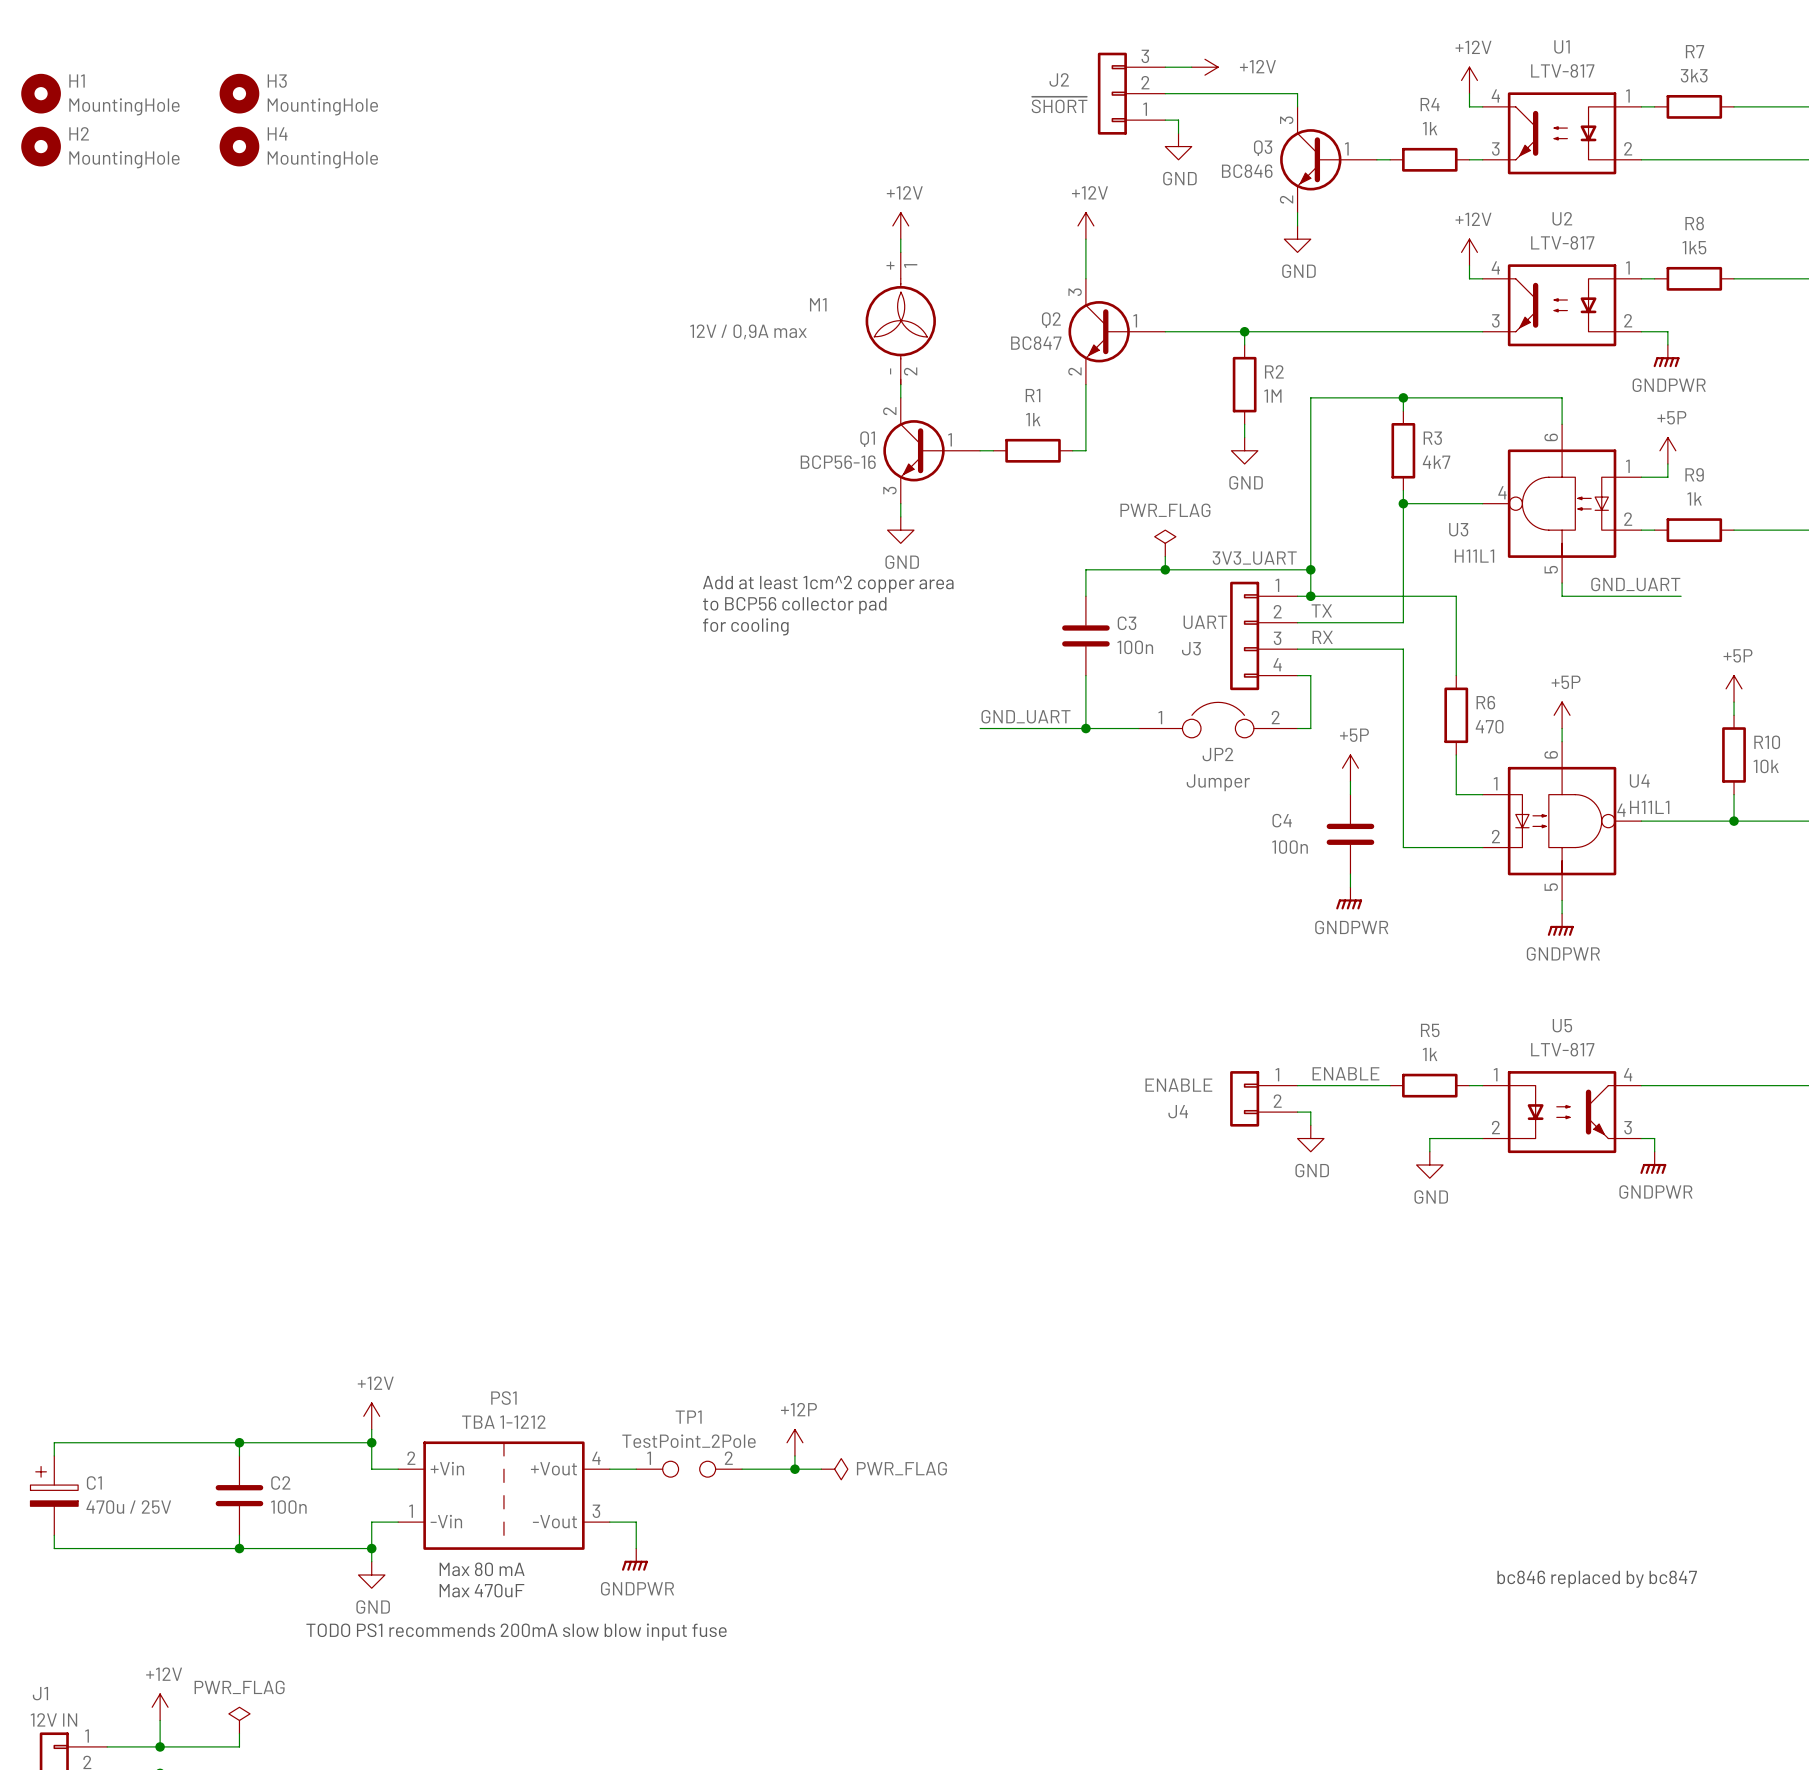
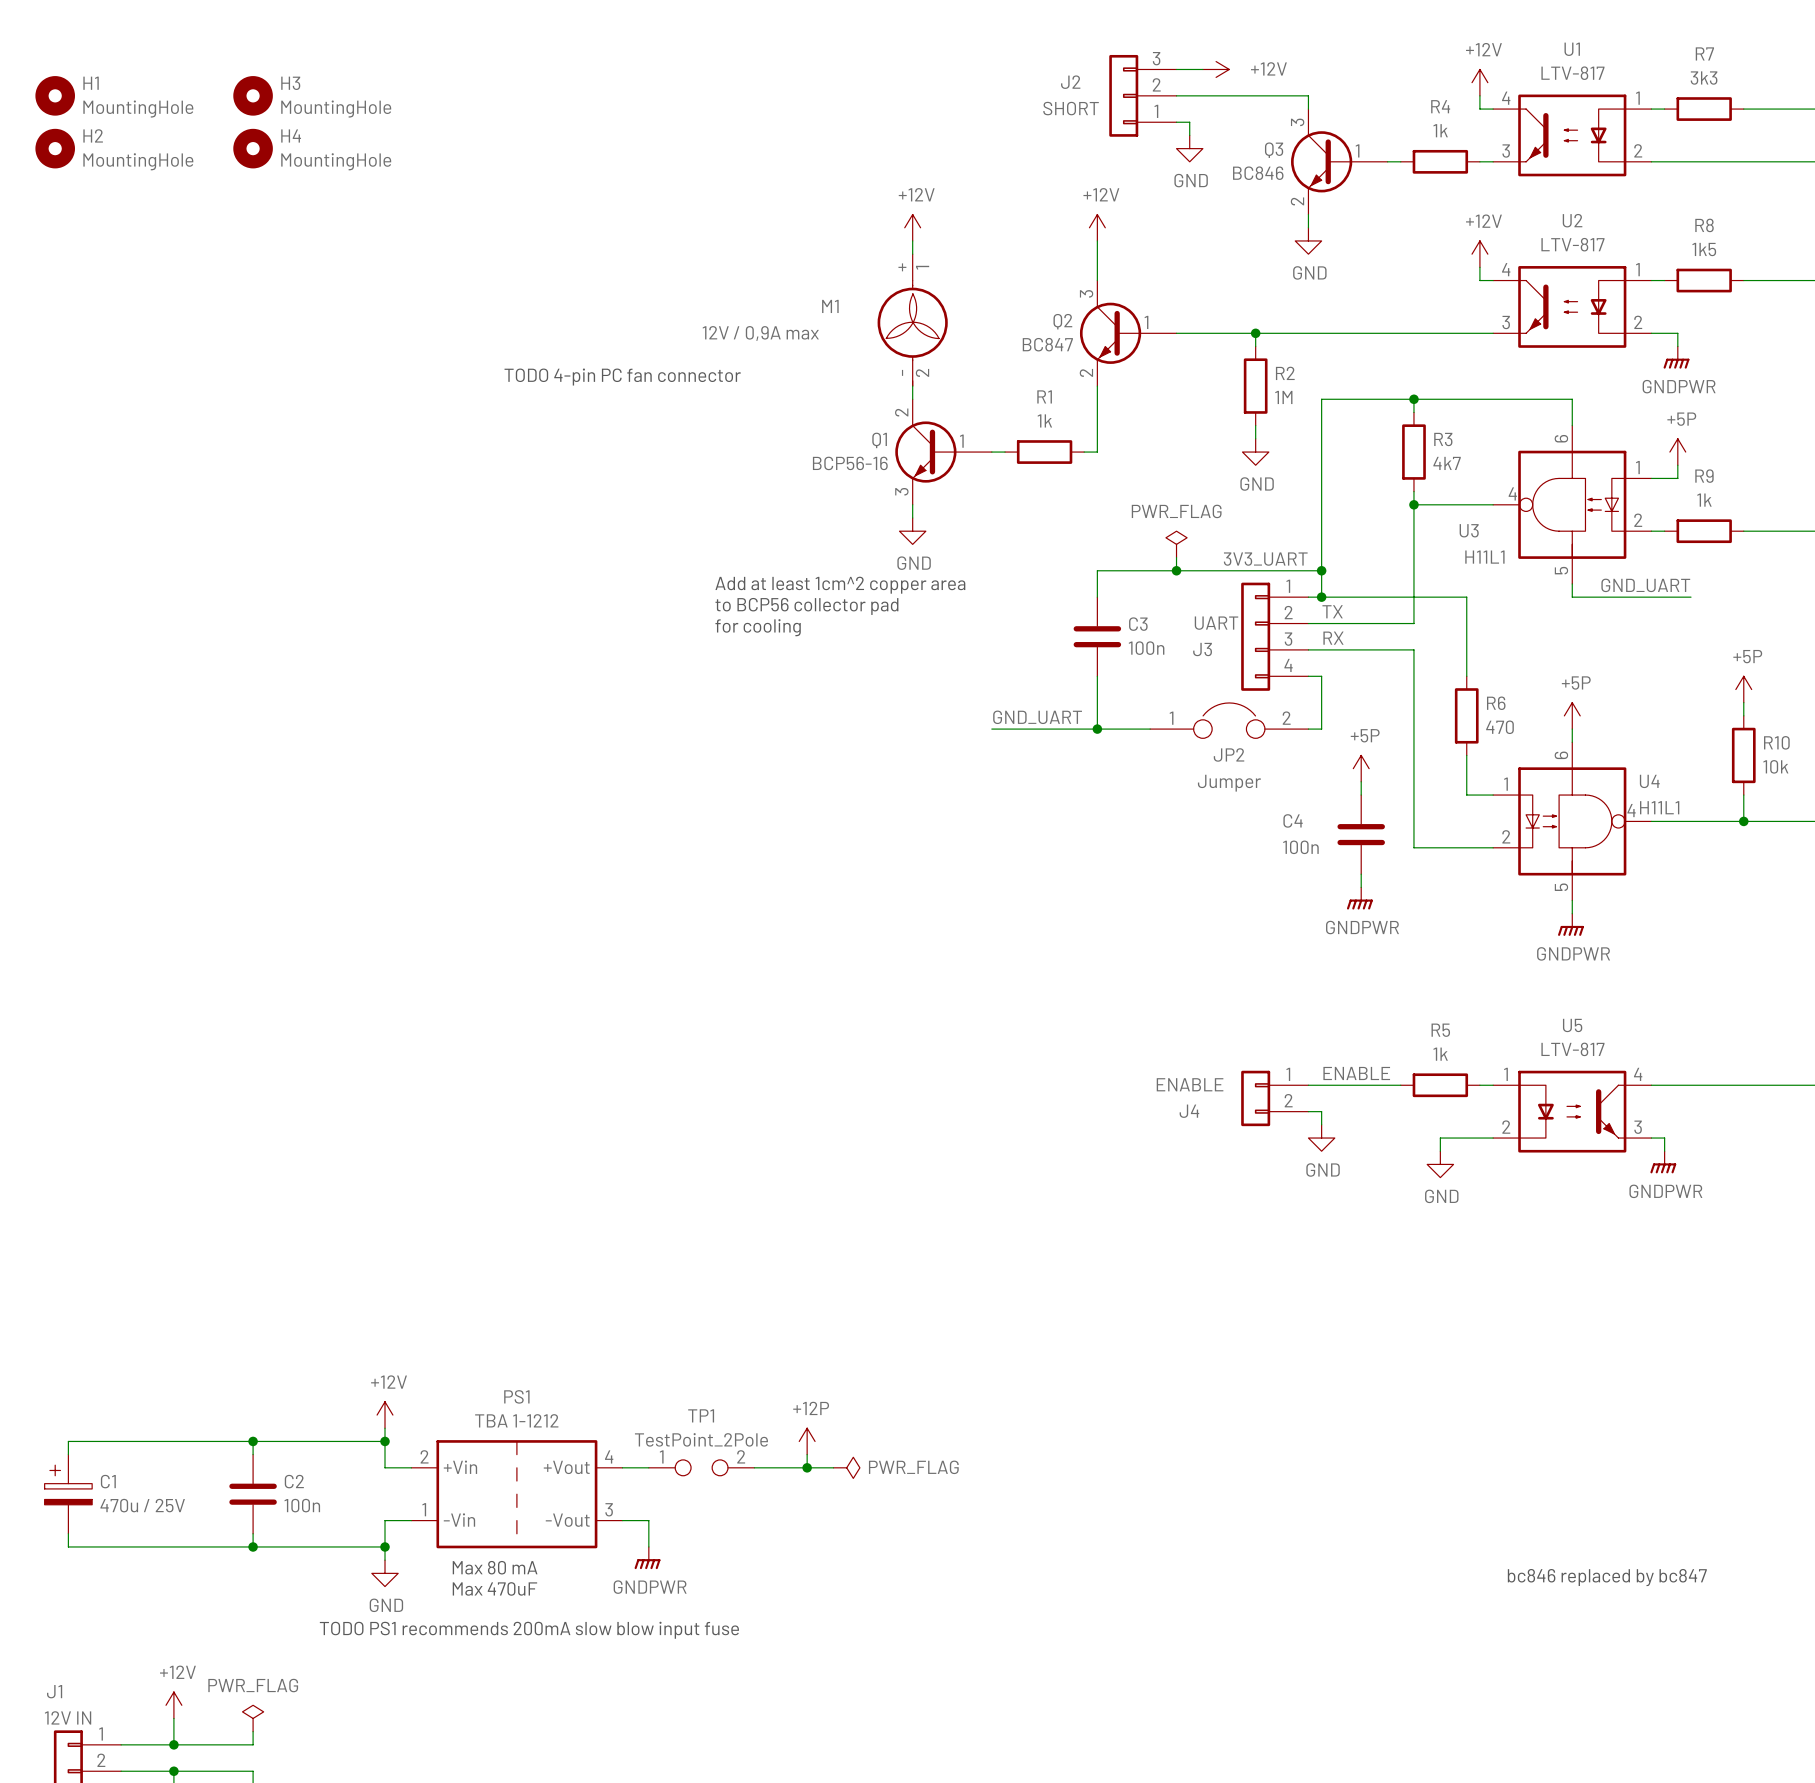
J2 value: ~{SHORT} (1059, 104) -> SHORT (1071, 108)
text: none -> TODO 4-pin PC fan connector (622, 377)

